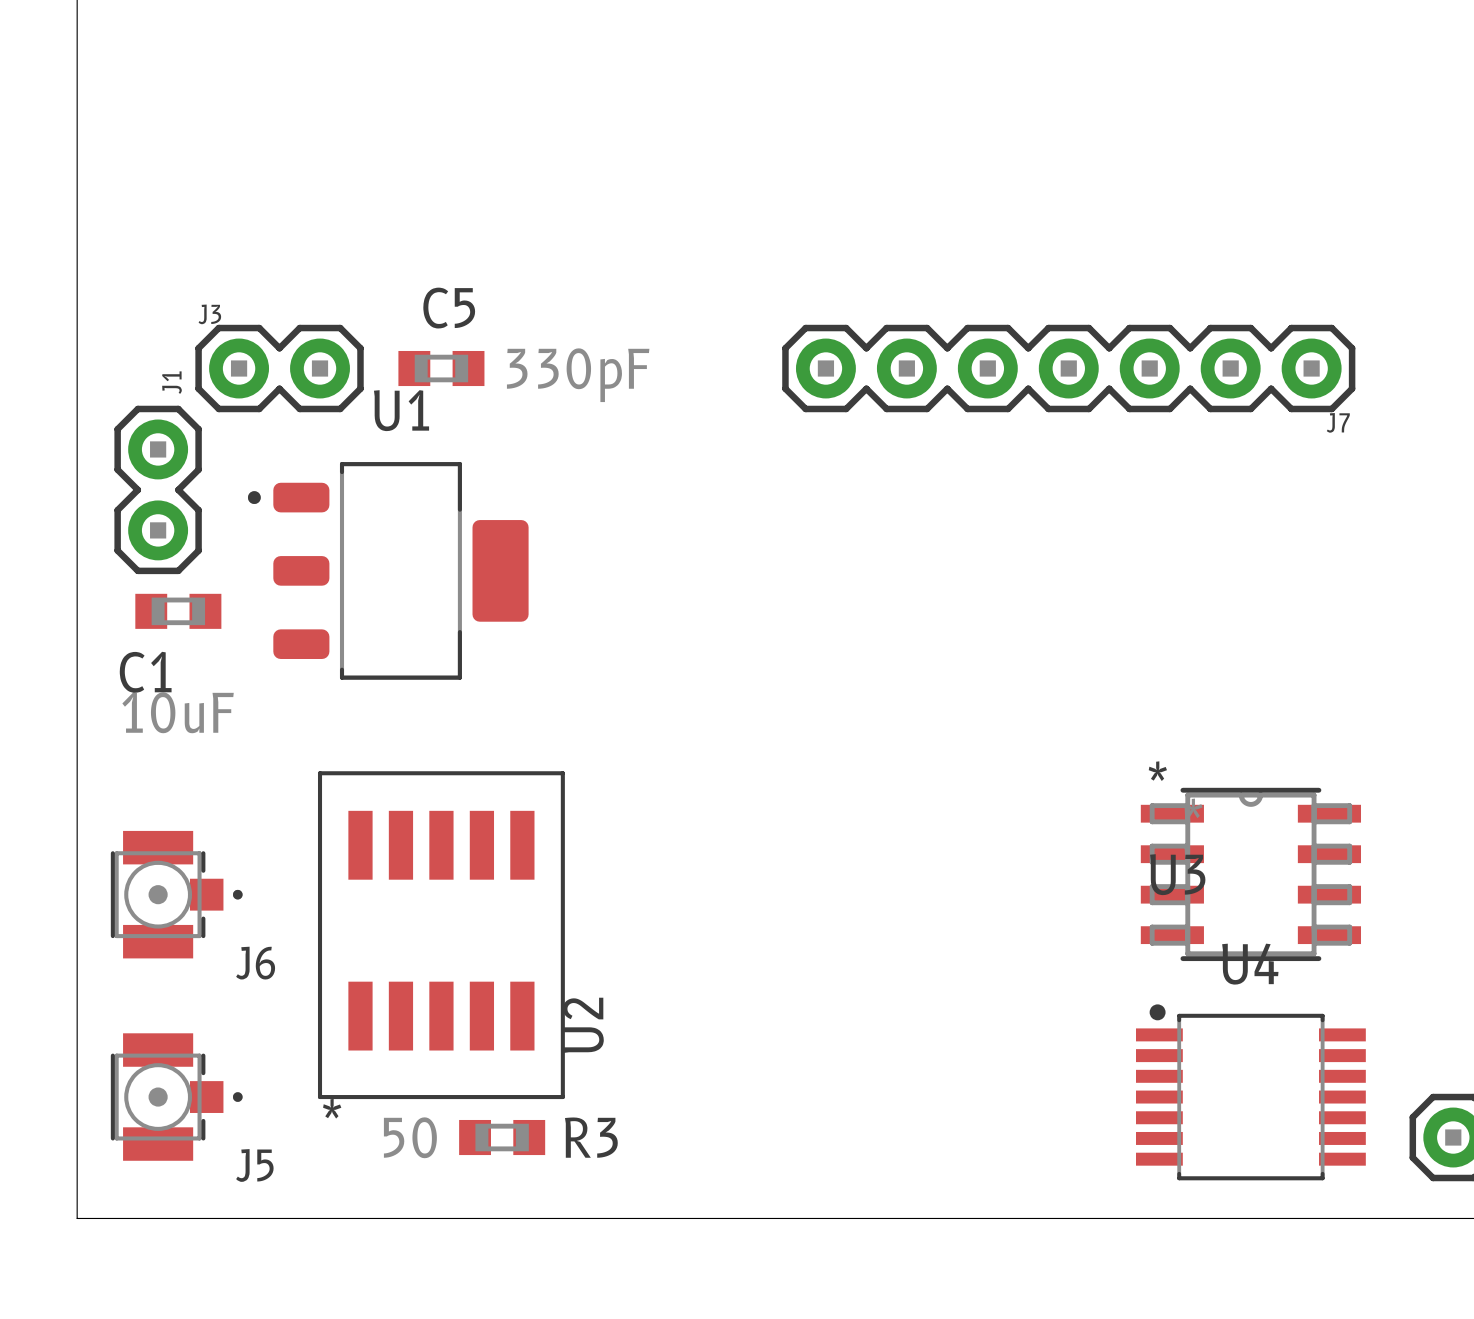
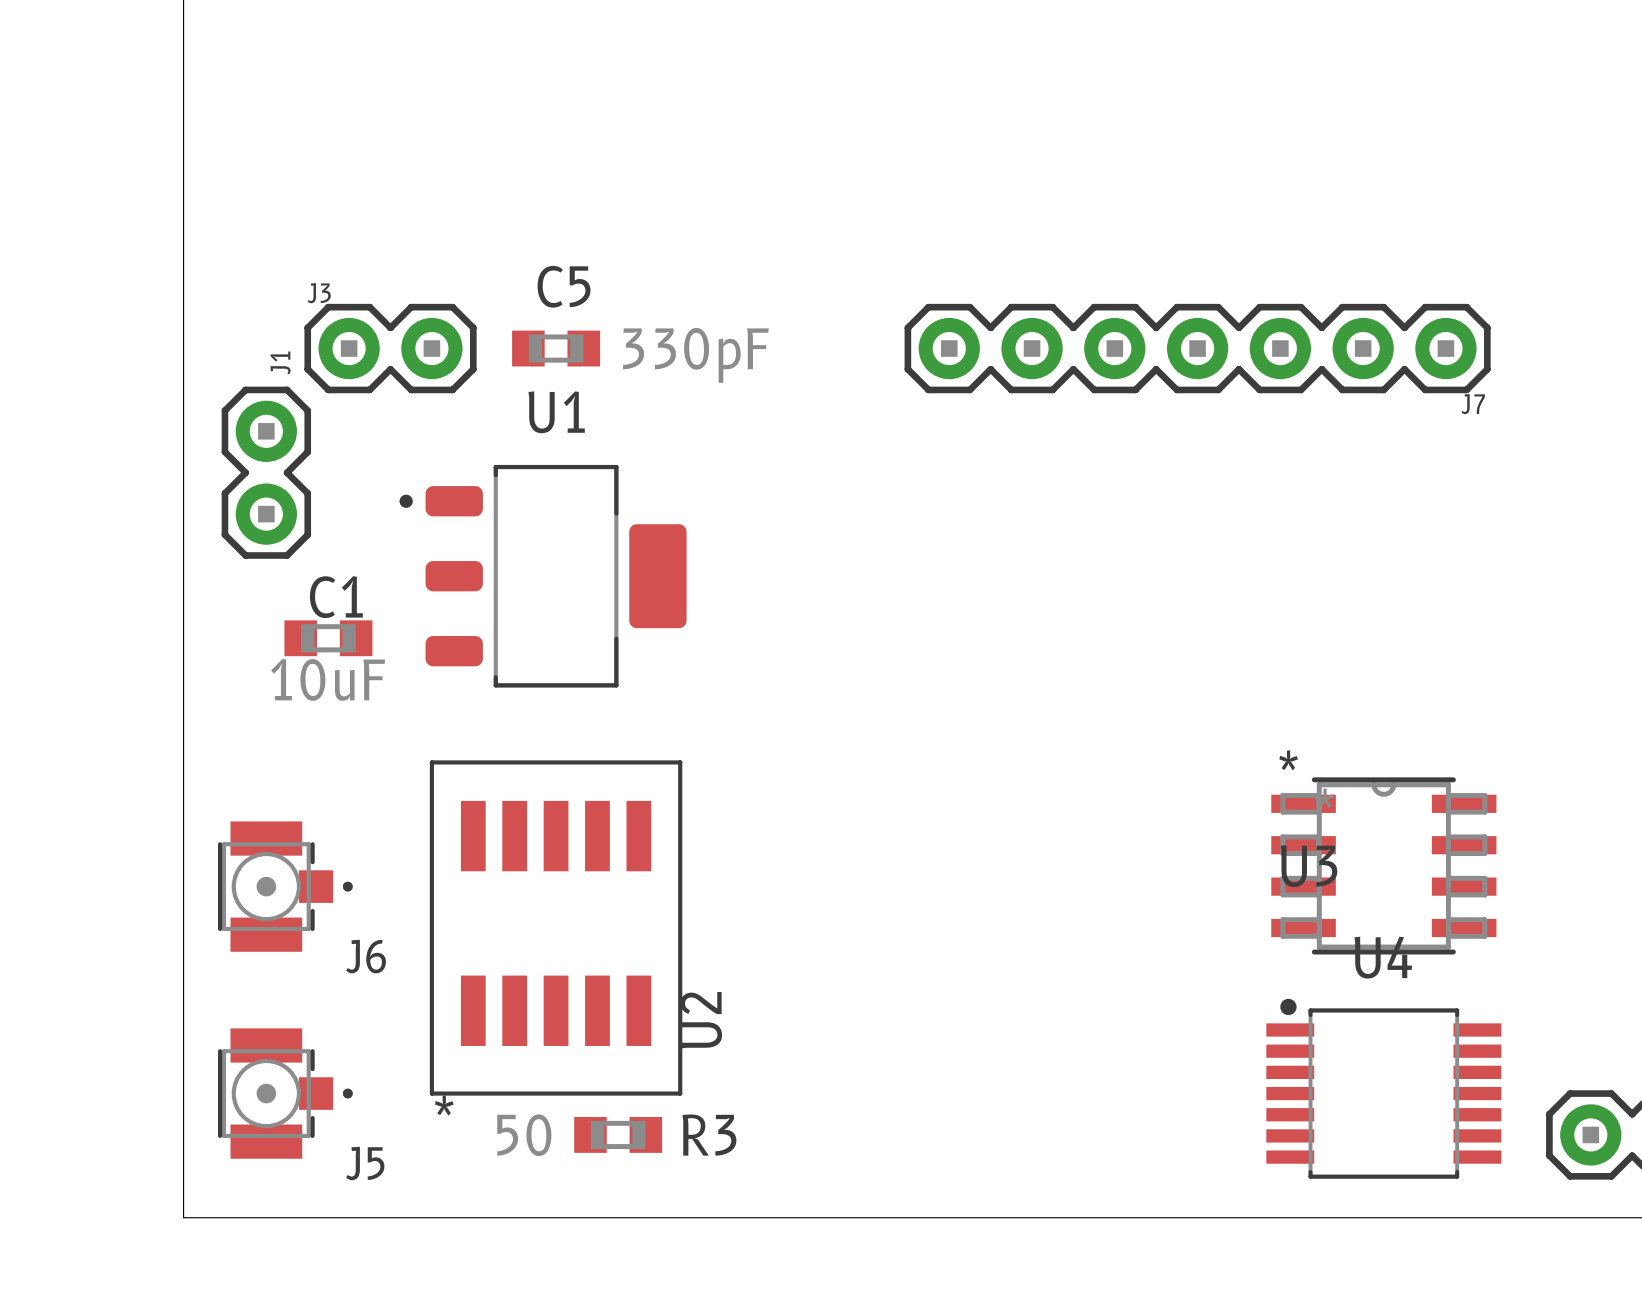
U1 position: (388, 570) -> (543, 576)
C1 position: (178, 611) -> (328, 638)
C1 name position: C1 (145, 672) -> C1 (336, 597)
C1 value position: 10uF (178, 712) -> 10uF (328, 679)

